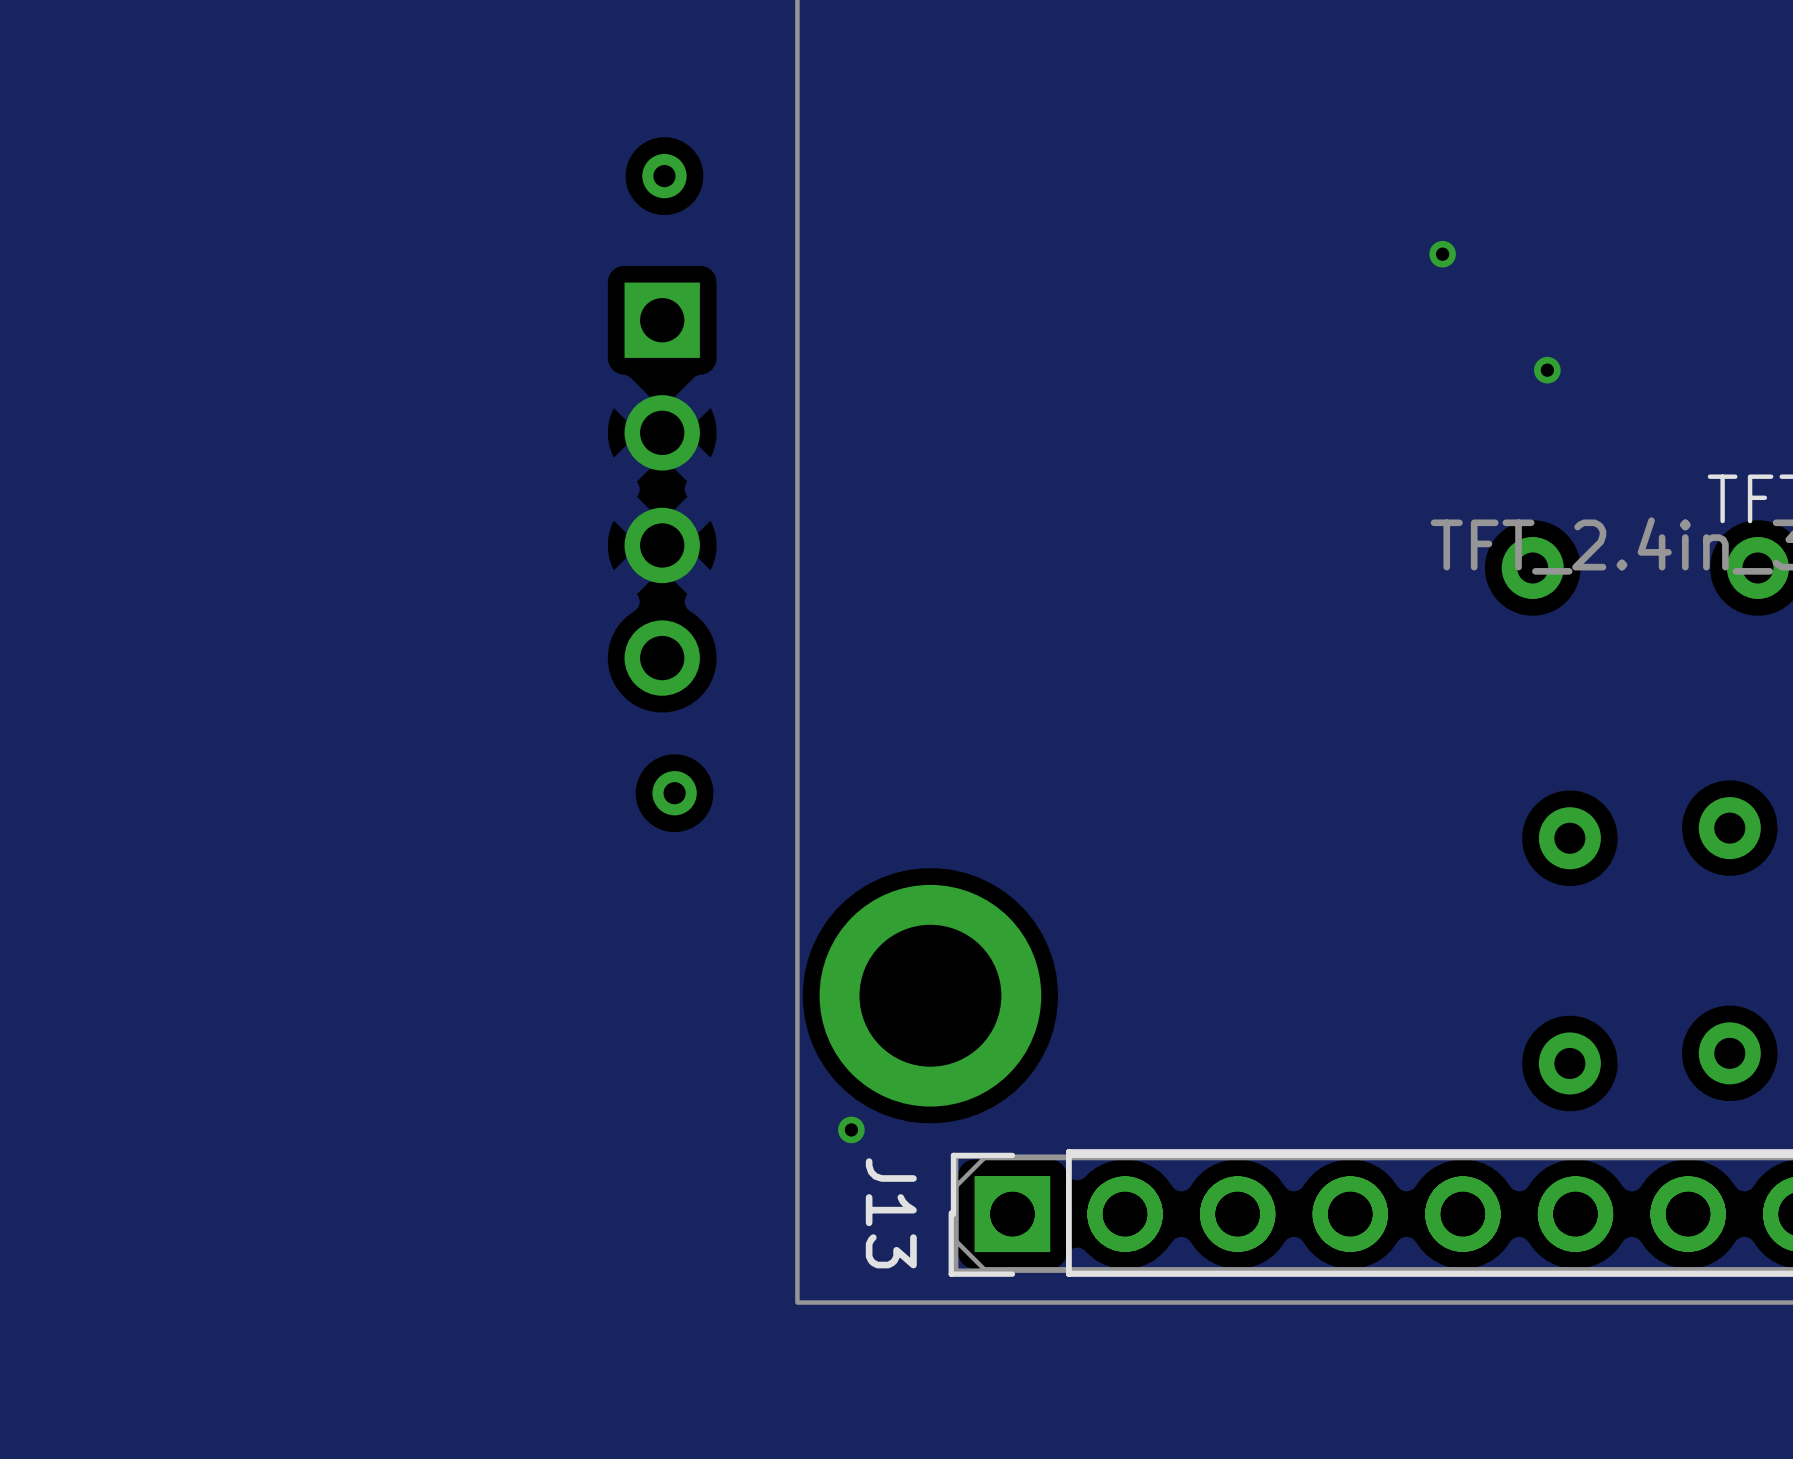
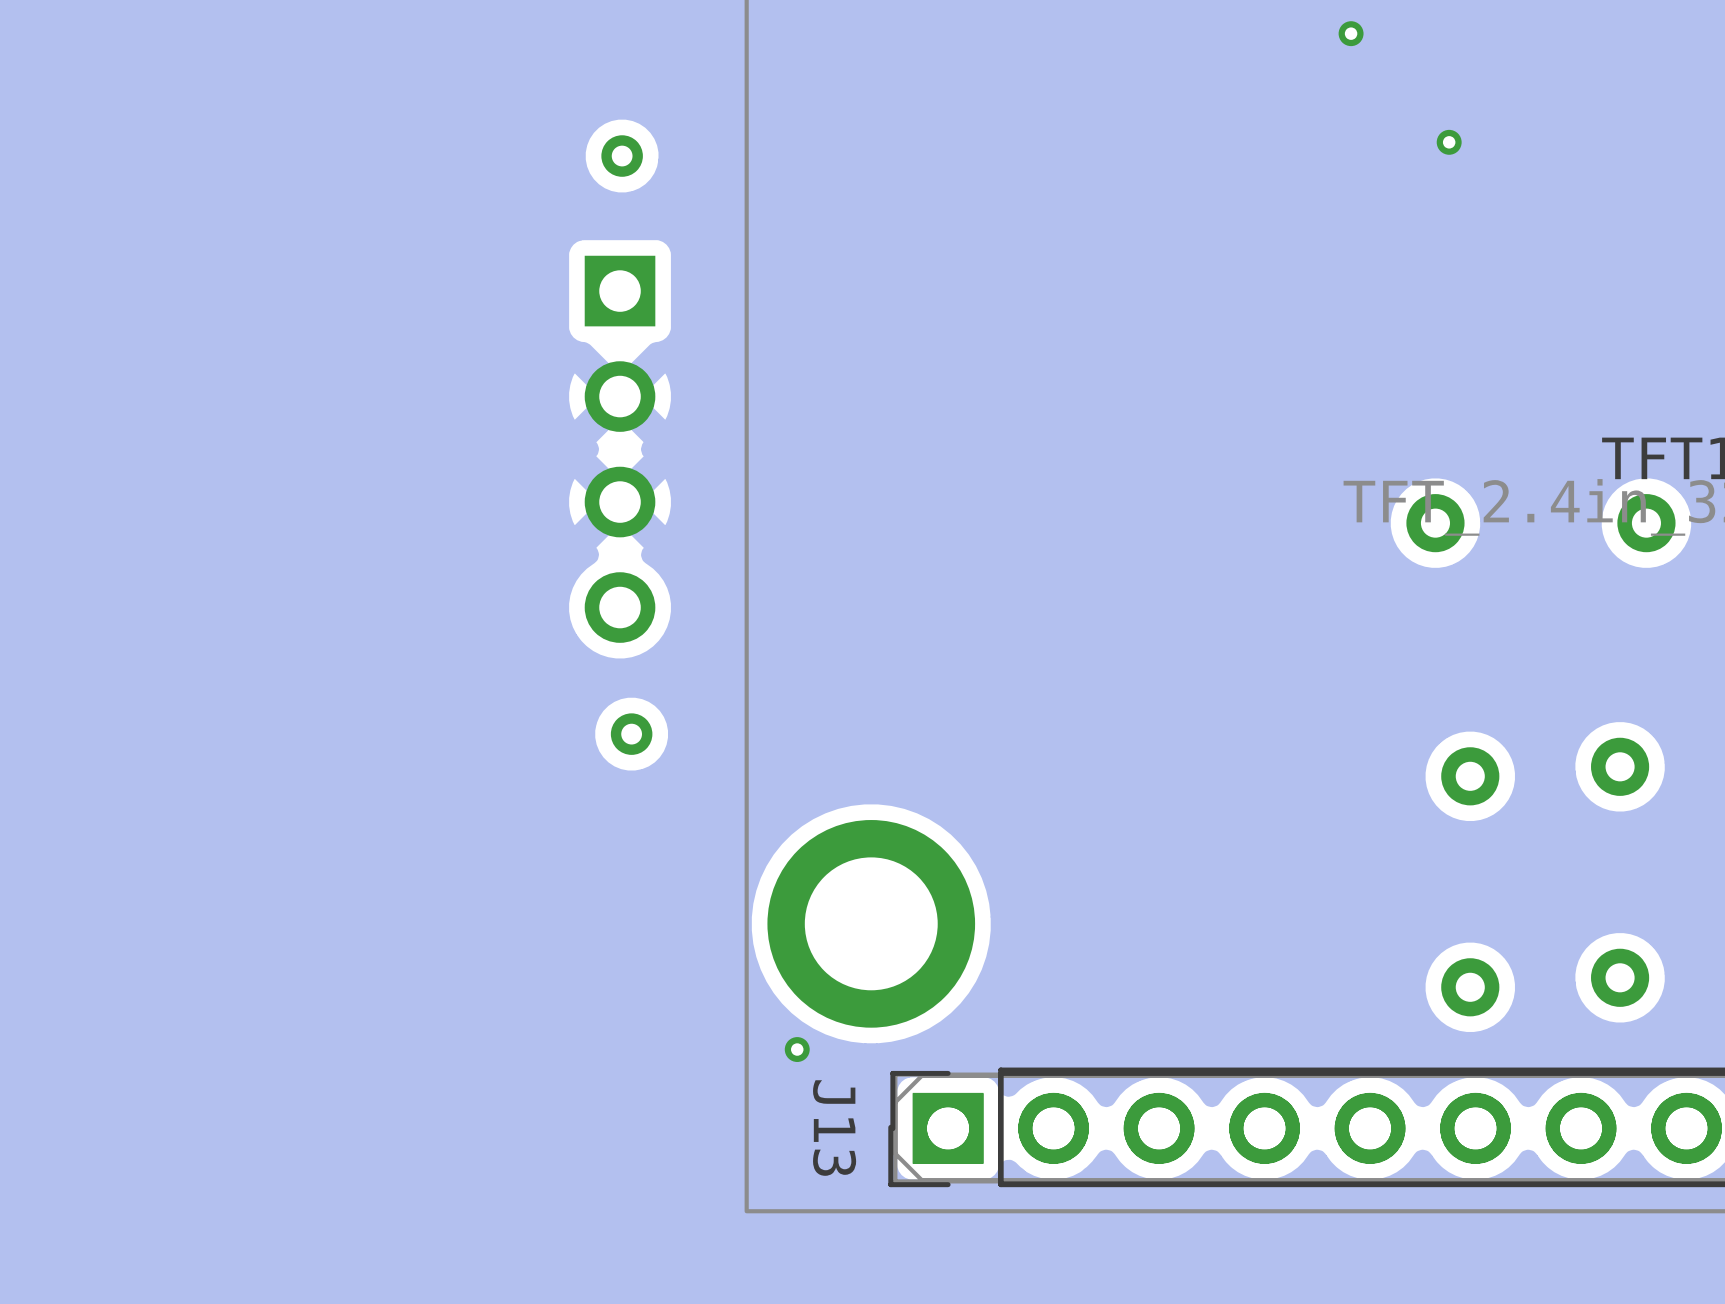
via: none -> (1351, 33)
via: none -> (1449, 142)
via: (1442, 254) -> none
via: (1547, 370) -> none

